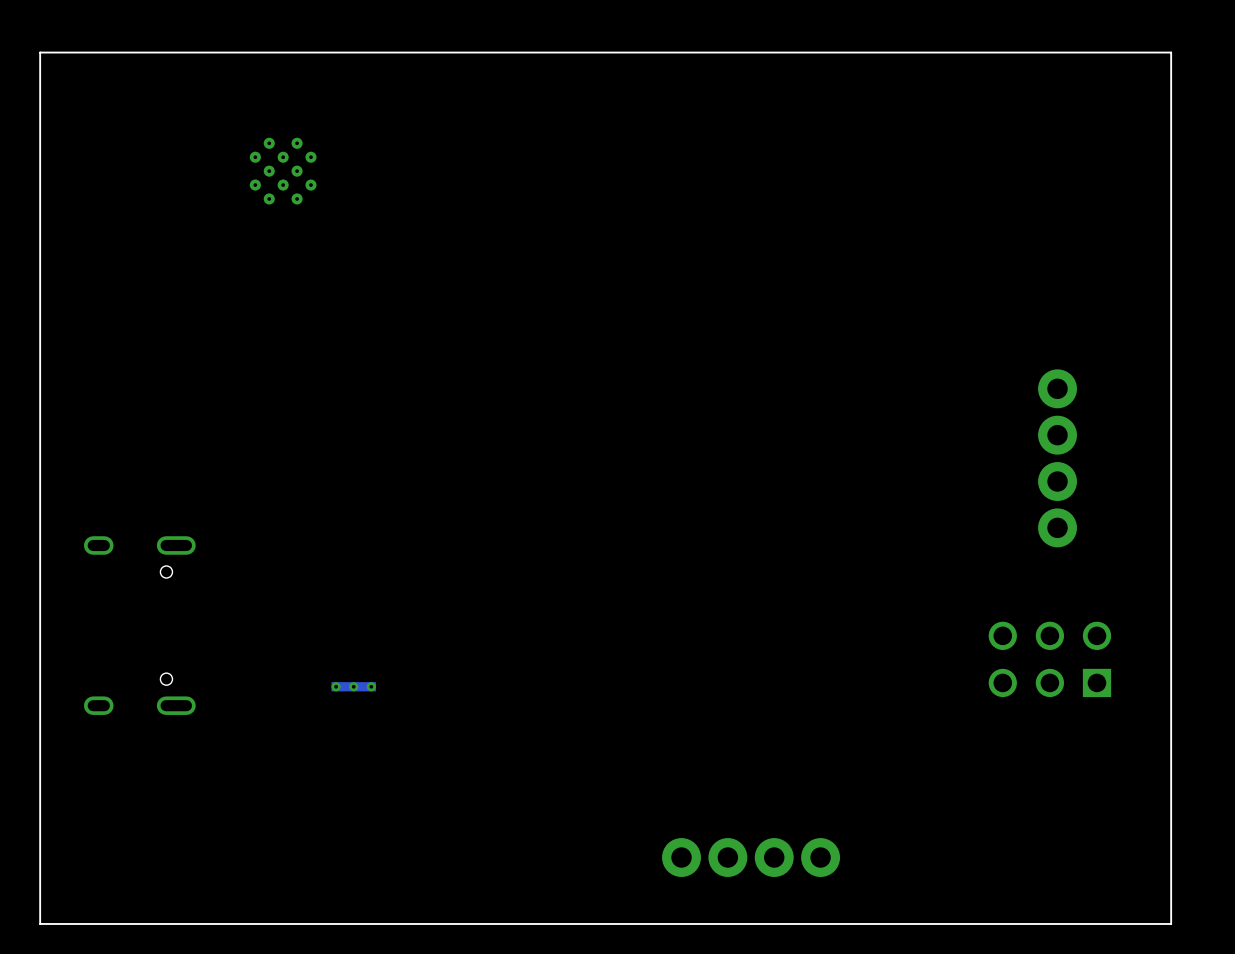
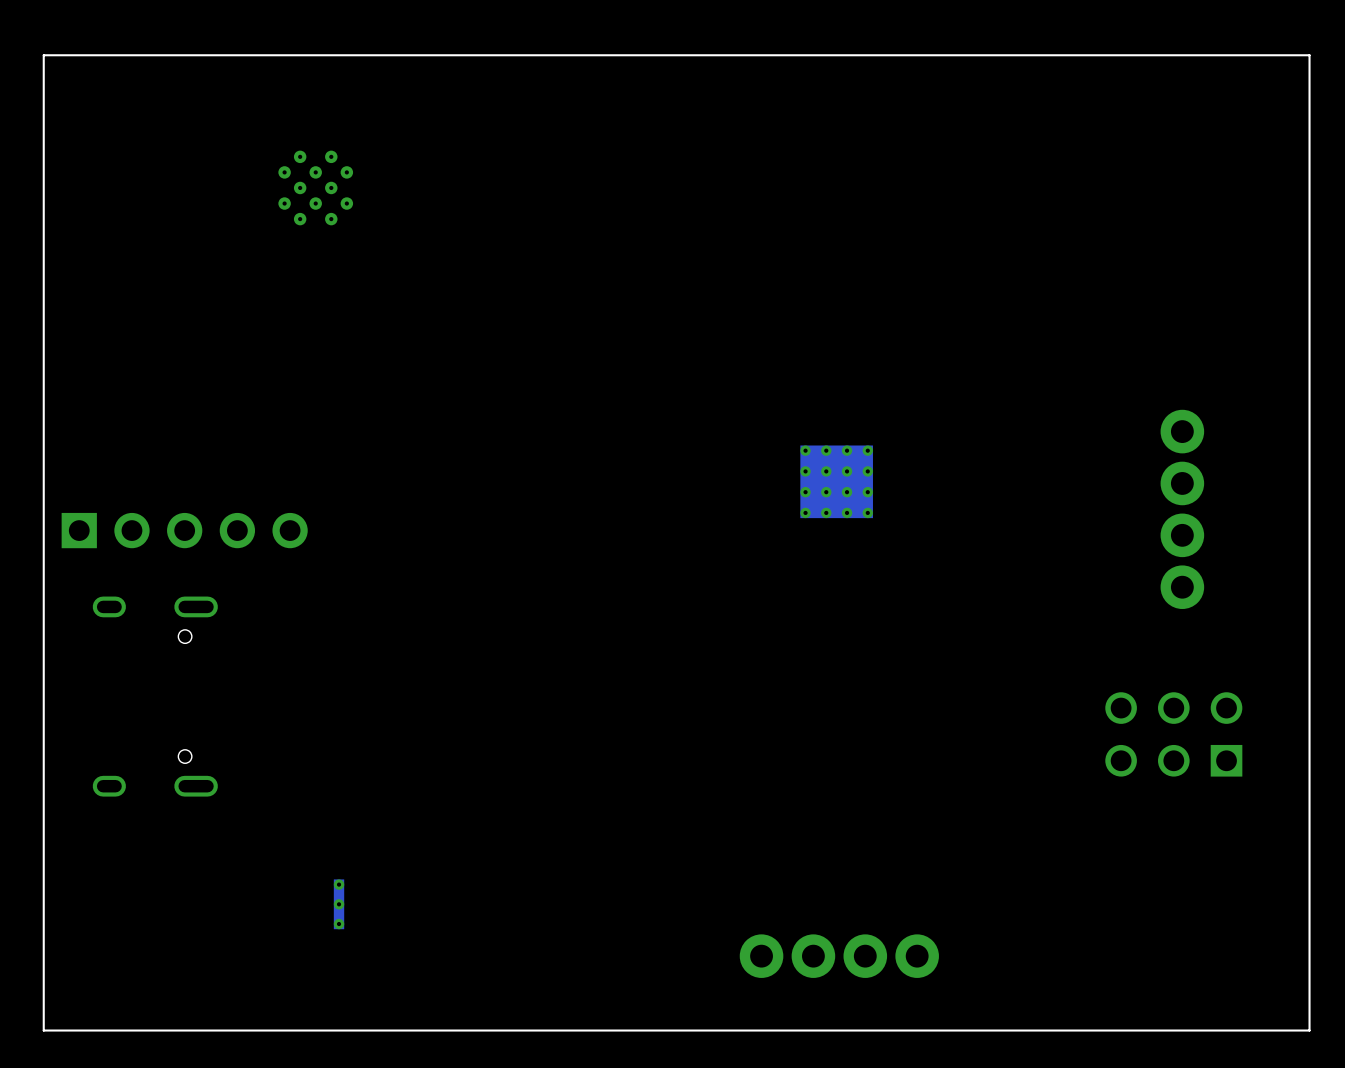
part: none -> (836, 481)
part: none -> (184, 530)
part rotation: 0° (353, 686) -> 90° clockwise (339, 904)
part position: (353, 686) -> (339, 904)

